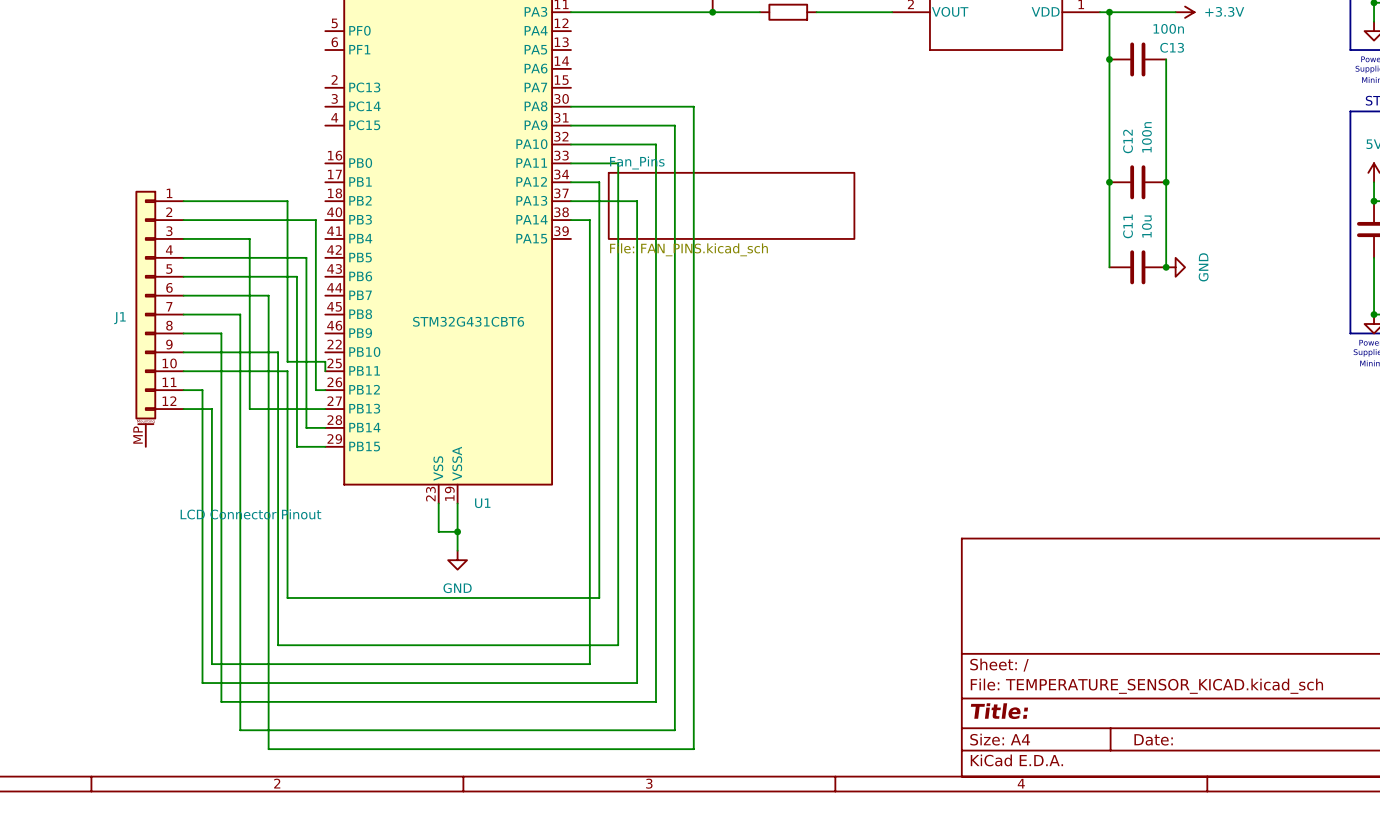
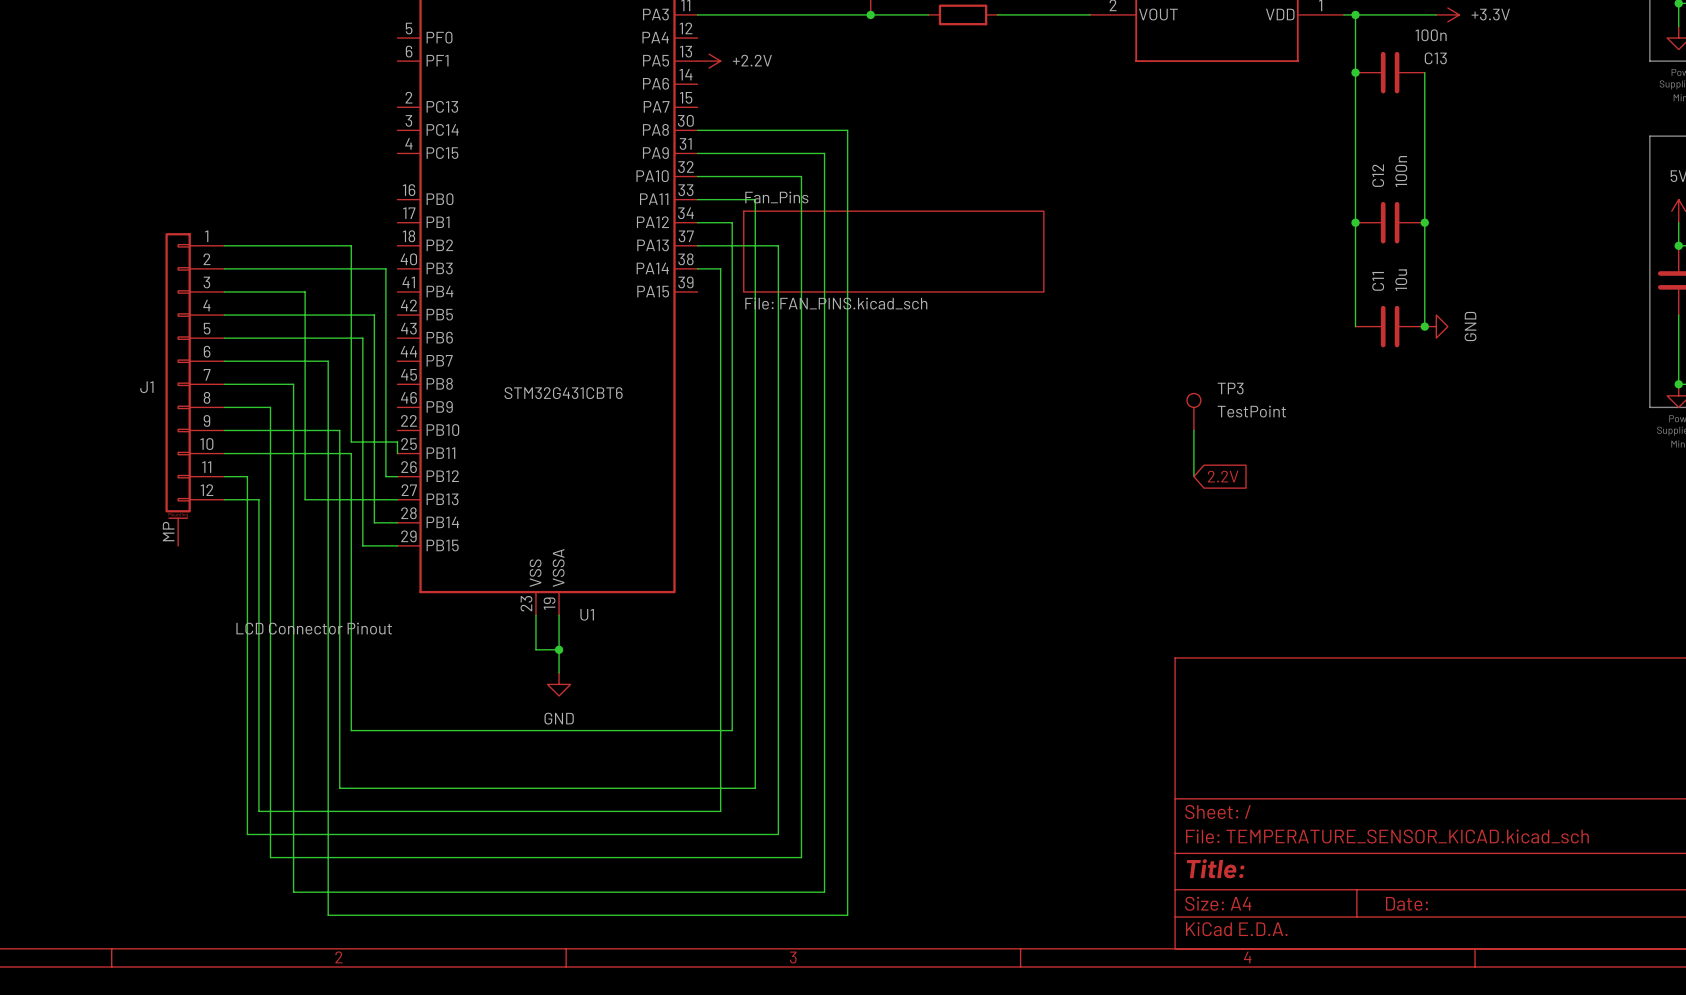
power symbol: none -> +2.2V (709, 61)
TP3: none -> TestPoint (1193, 412)
wire: none -> (1193, 430) (1193, 476)
global label: none -> 2.2V (1223, 476)

